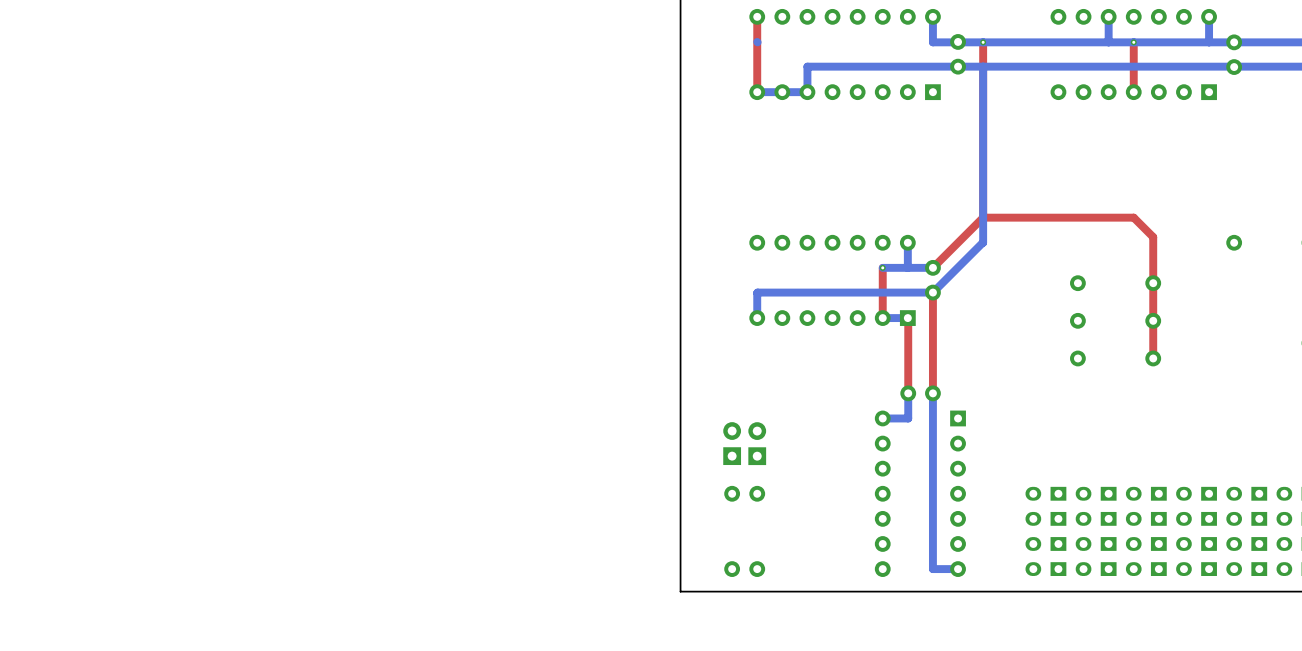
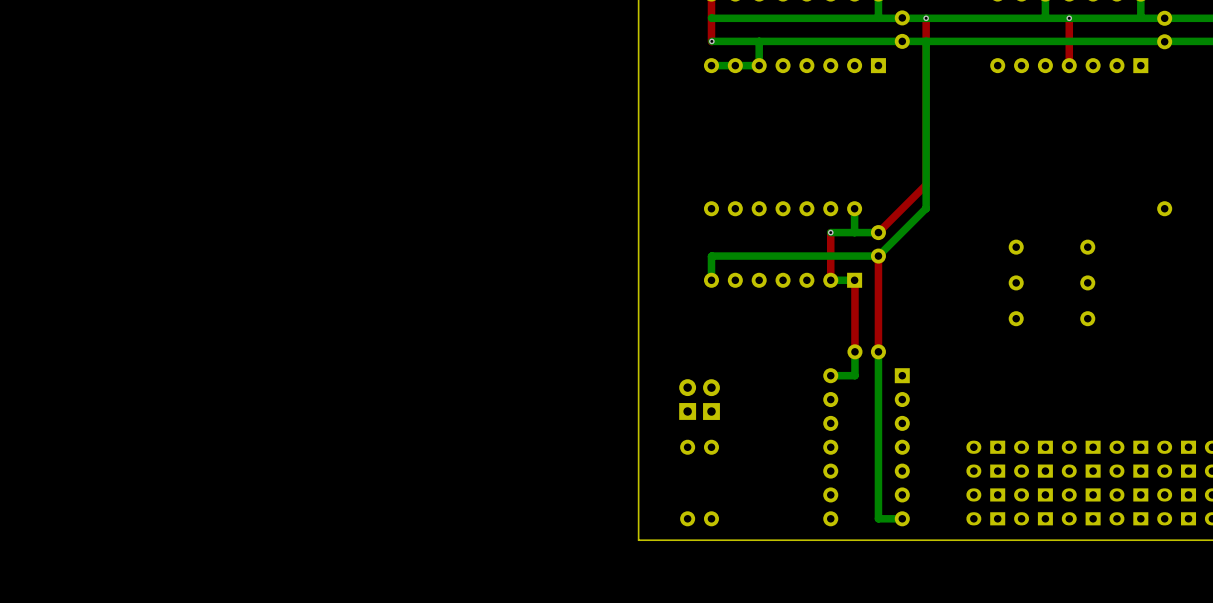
bottom track: none -> (878, 18) (711, 18)
via: none -> (711, 41)
bottom track: none -> (759, 41) (711, 41)
top track: (757, 67) (757, 92) -> none
top track: (983, 217) (1133, 217) (1153, 237) (1153, 358) -> none

